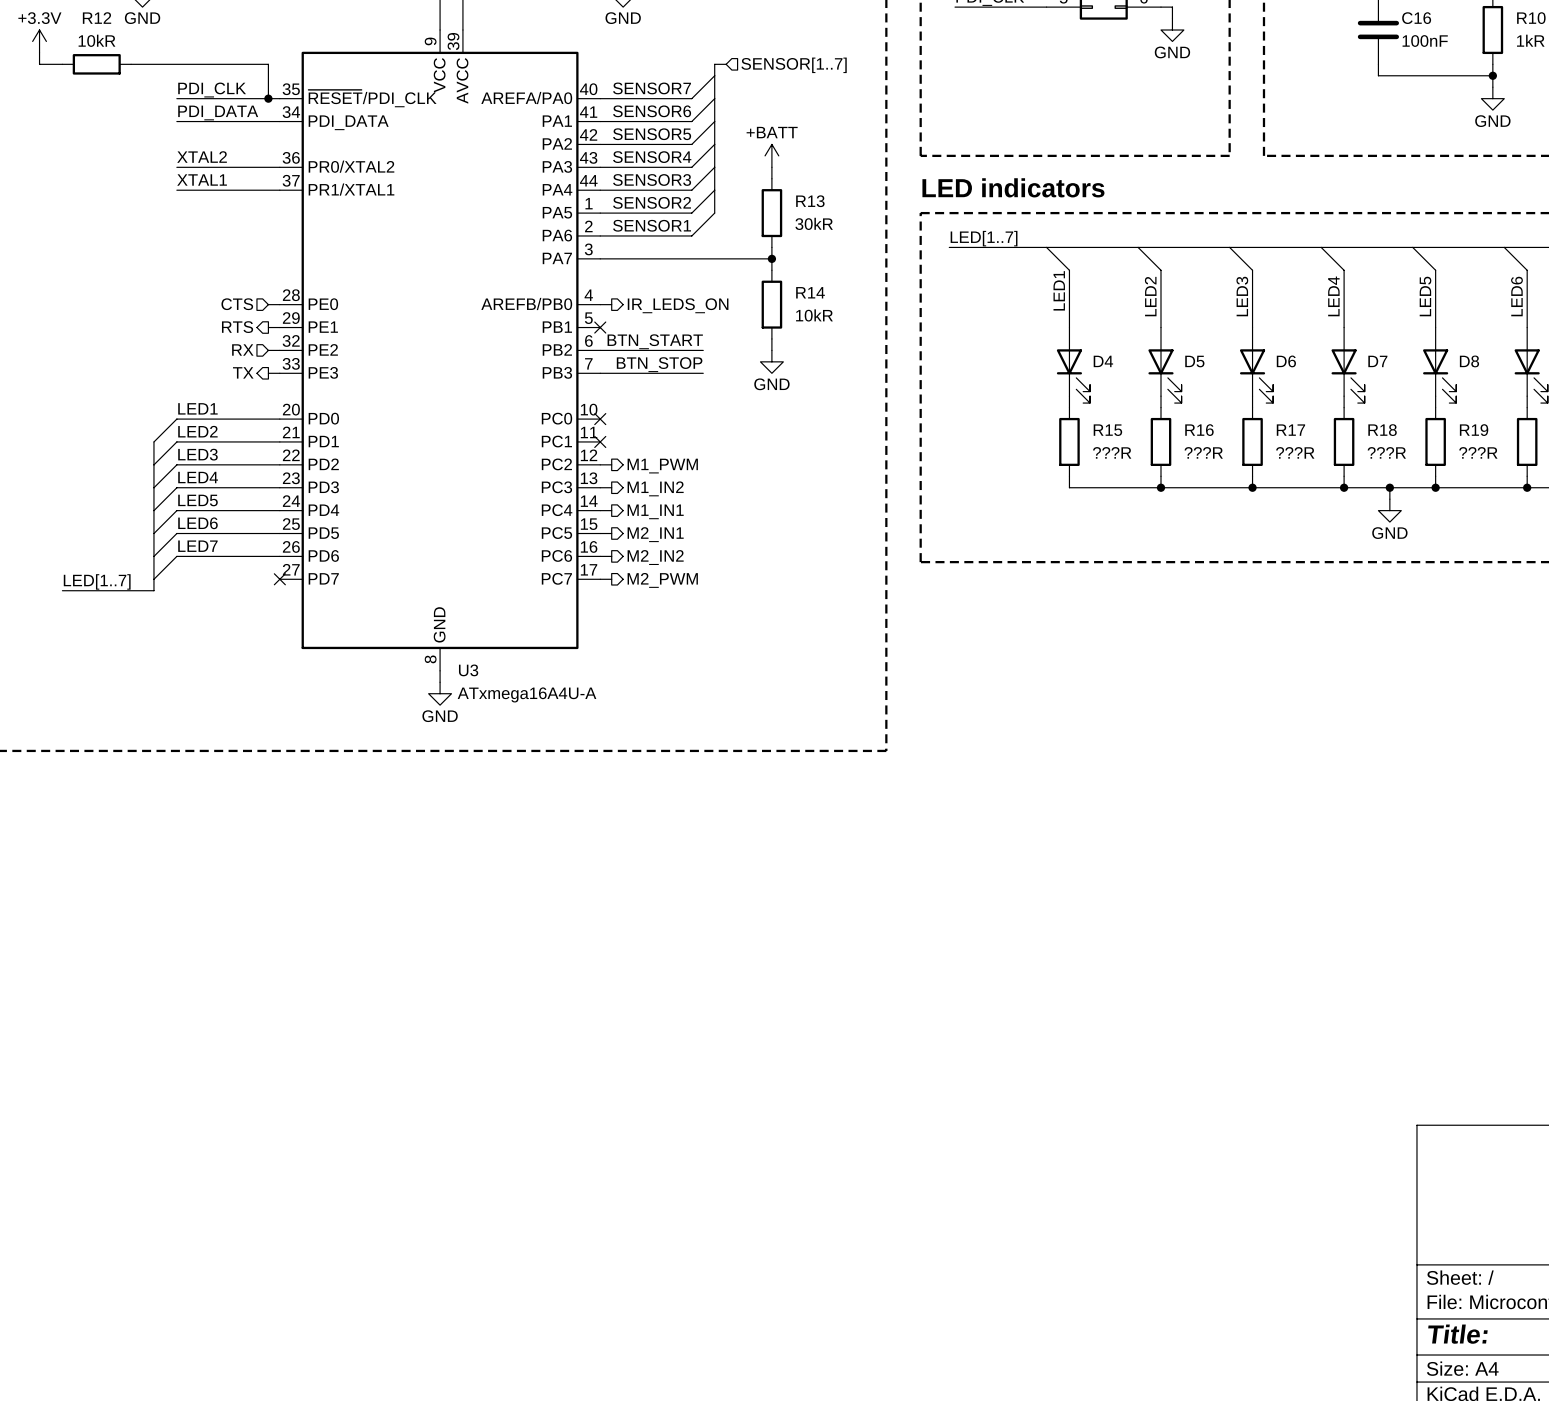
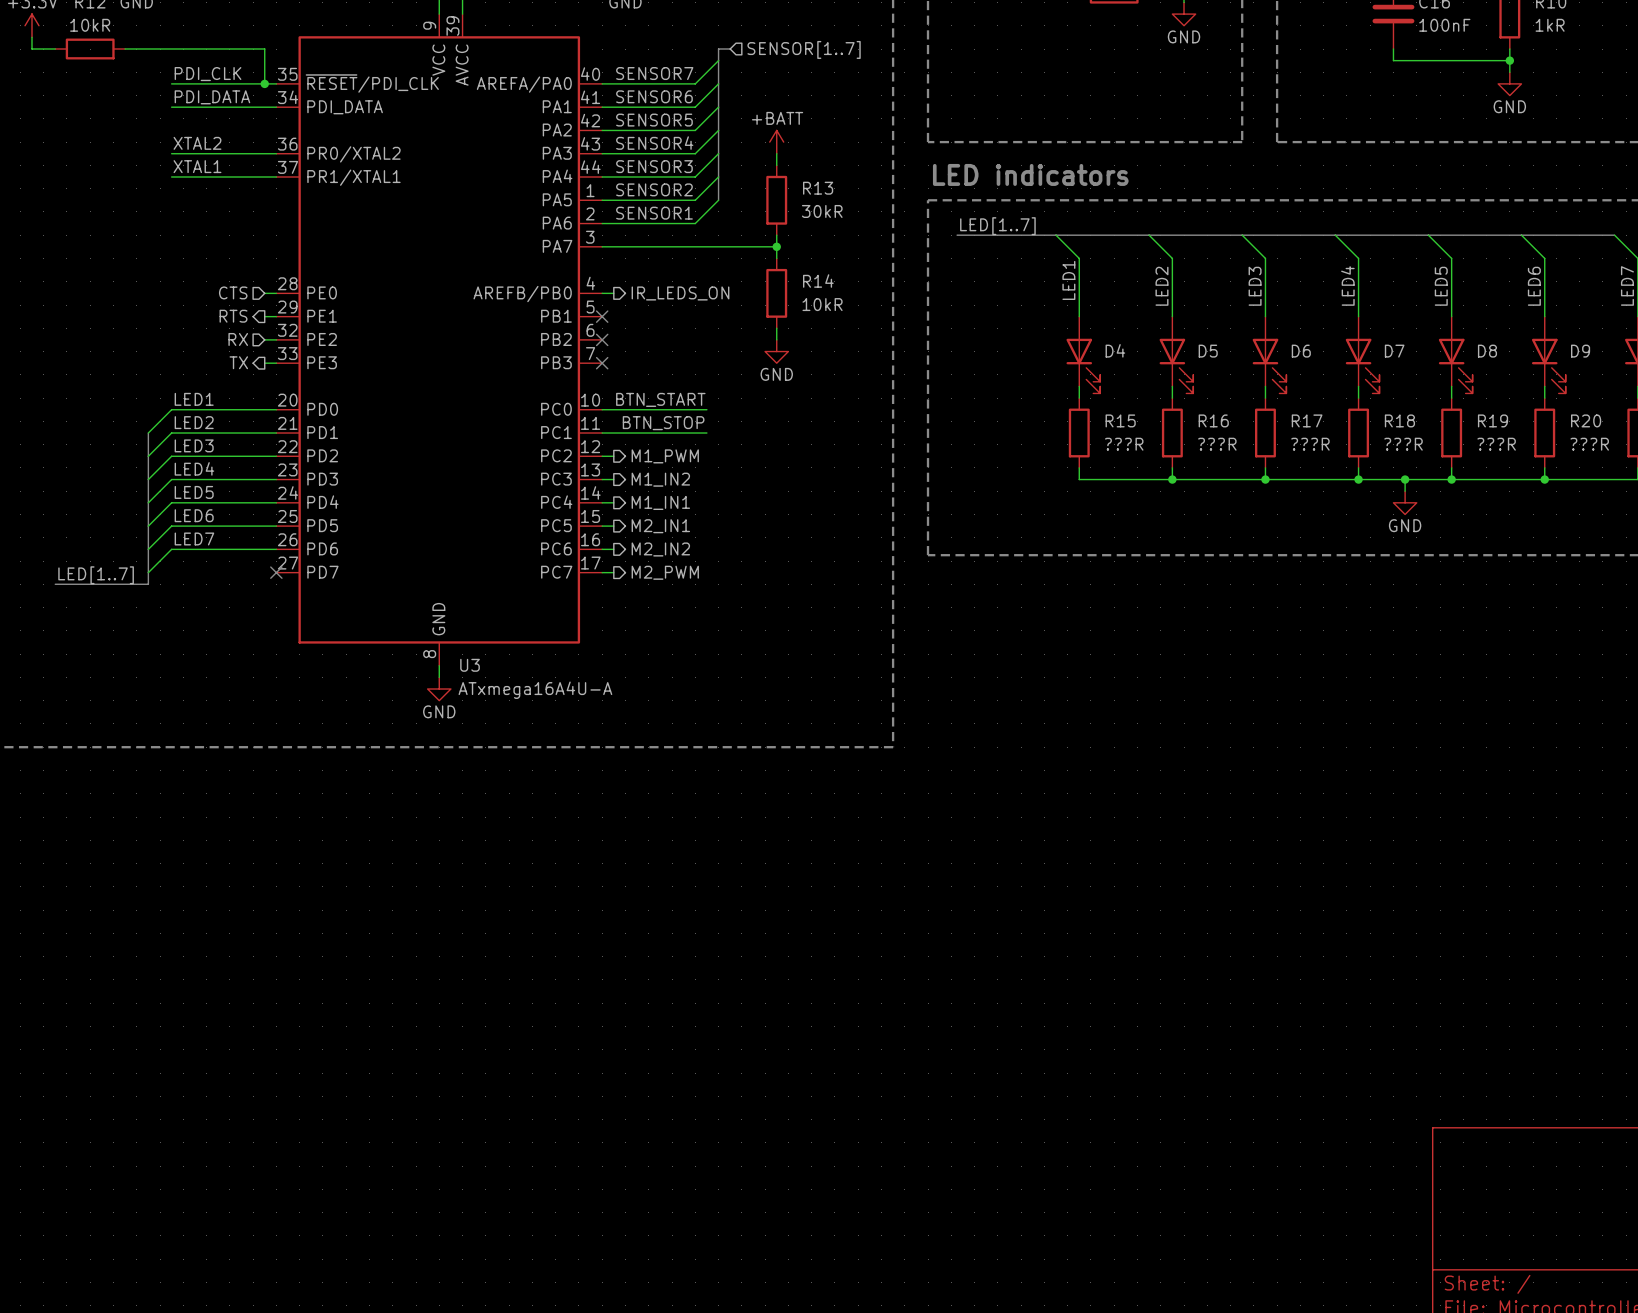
label position: BTN_START (655, 341) -> BTN_START (660, 399)
wire: (600, 350) (703, 350) -> (602, 433) (706, 433)
no-connect mark: none -> (602, 339)
label position: BTN_STOP (659, 364) -> BTN_STOP (663, 423)
wire: (600, 373) (703, 373) -> (602, 409) (706, 409)
no-connect mark: none -> (602, 363)
no-connect mark: (600, 419) -> none
no-connect mark: (600, 441) -> none

